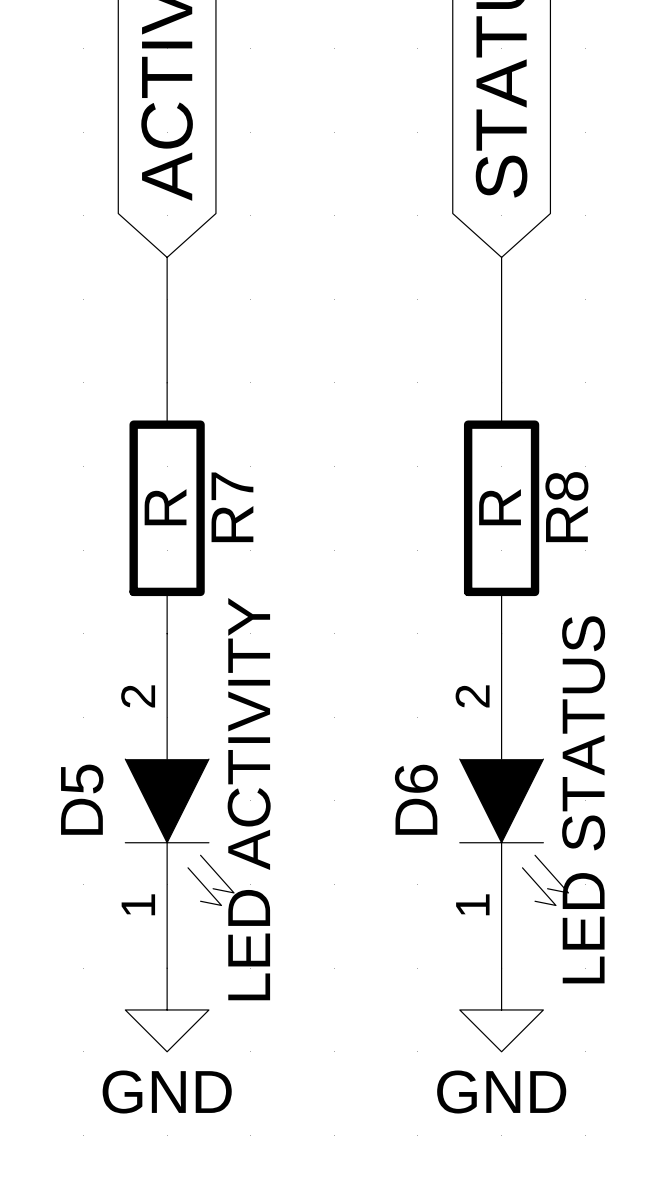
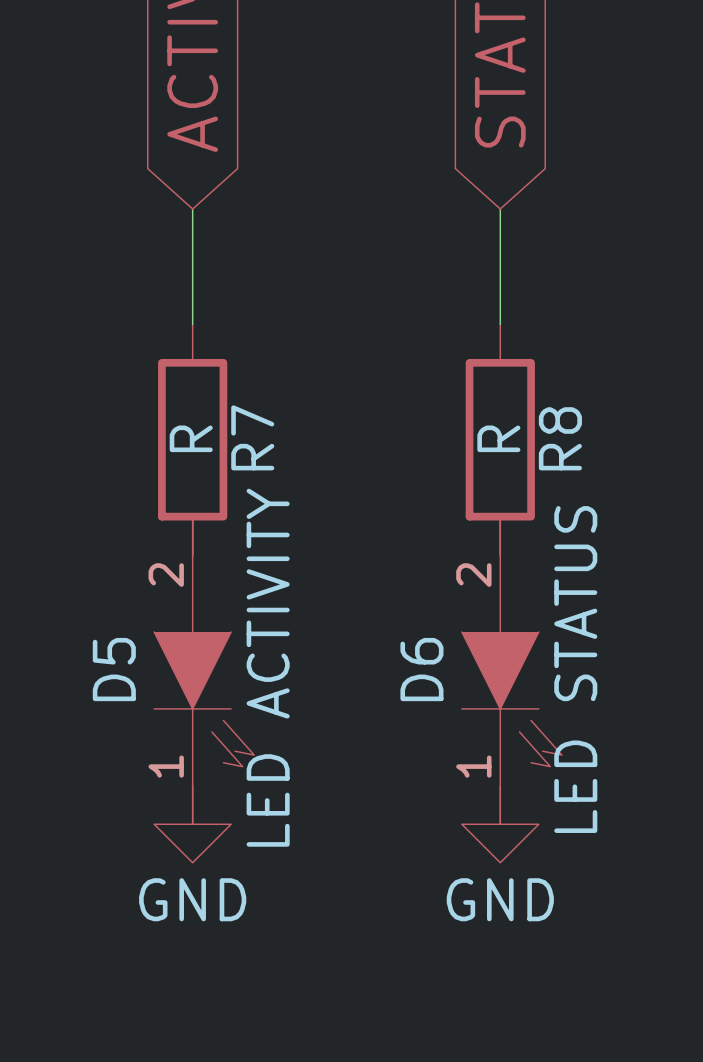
D5 position: (179, 800) -> (204, 670)
D6 position: (514, 800) -> (511, 670)
power symbol position: GND (167, 1009) -> GND (192, 824)
power symbol position: GND (501, 1009) -> GND (500, 824)

